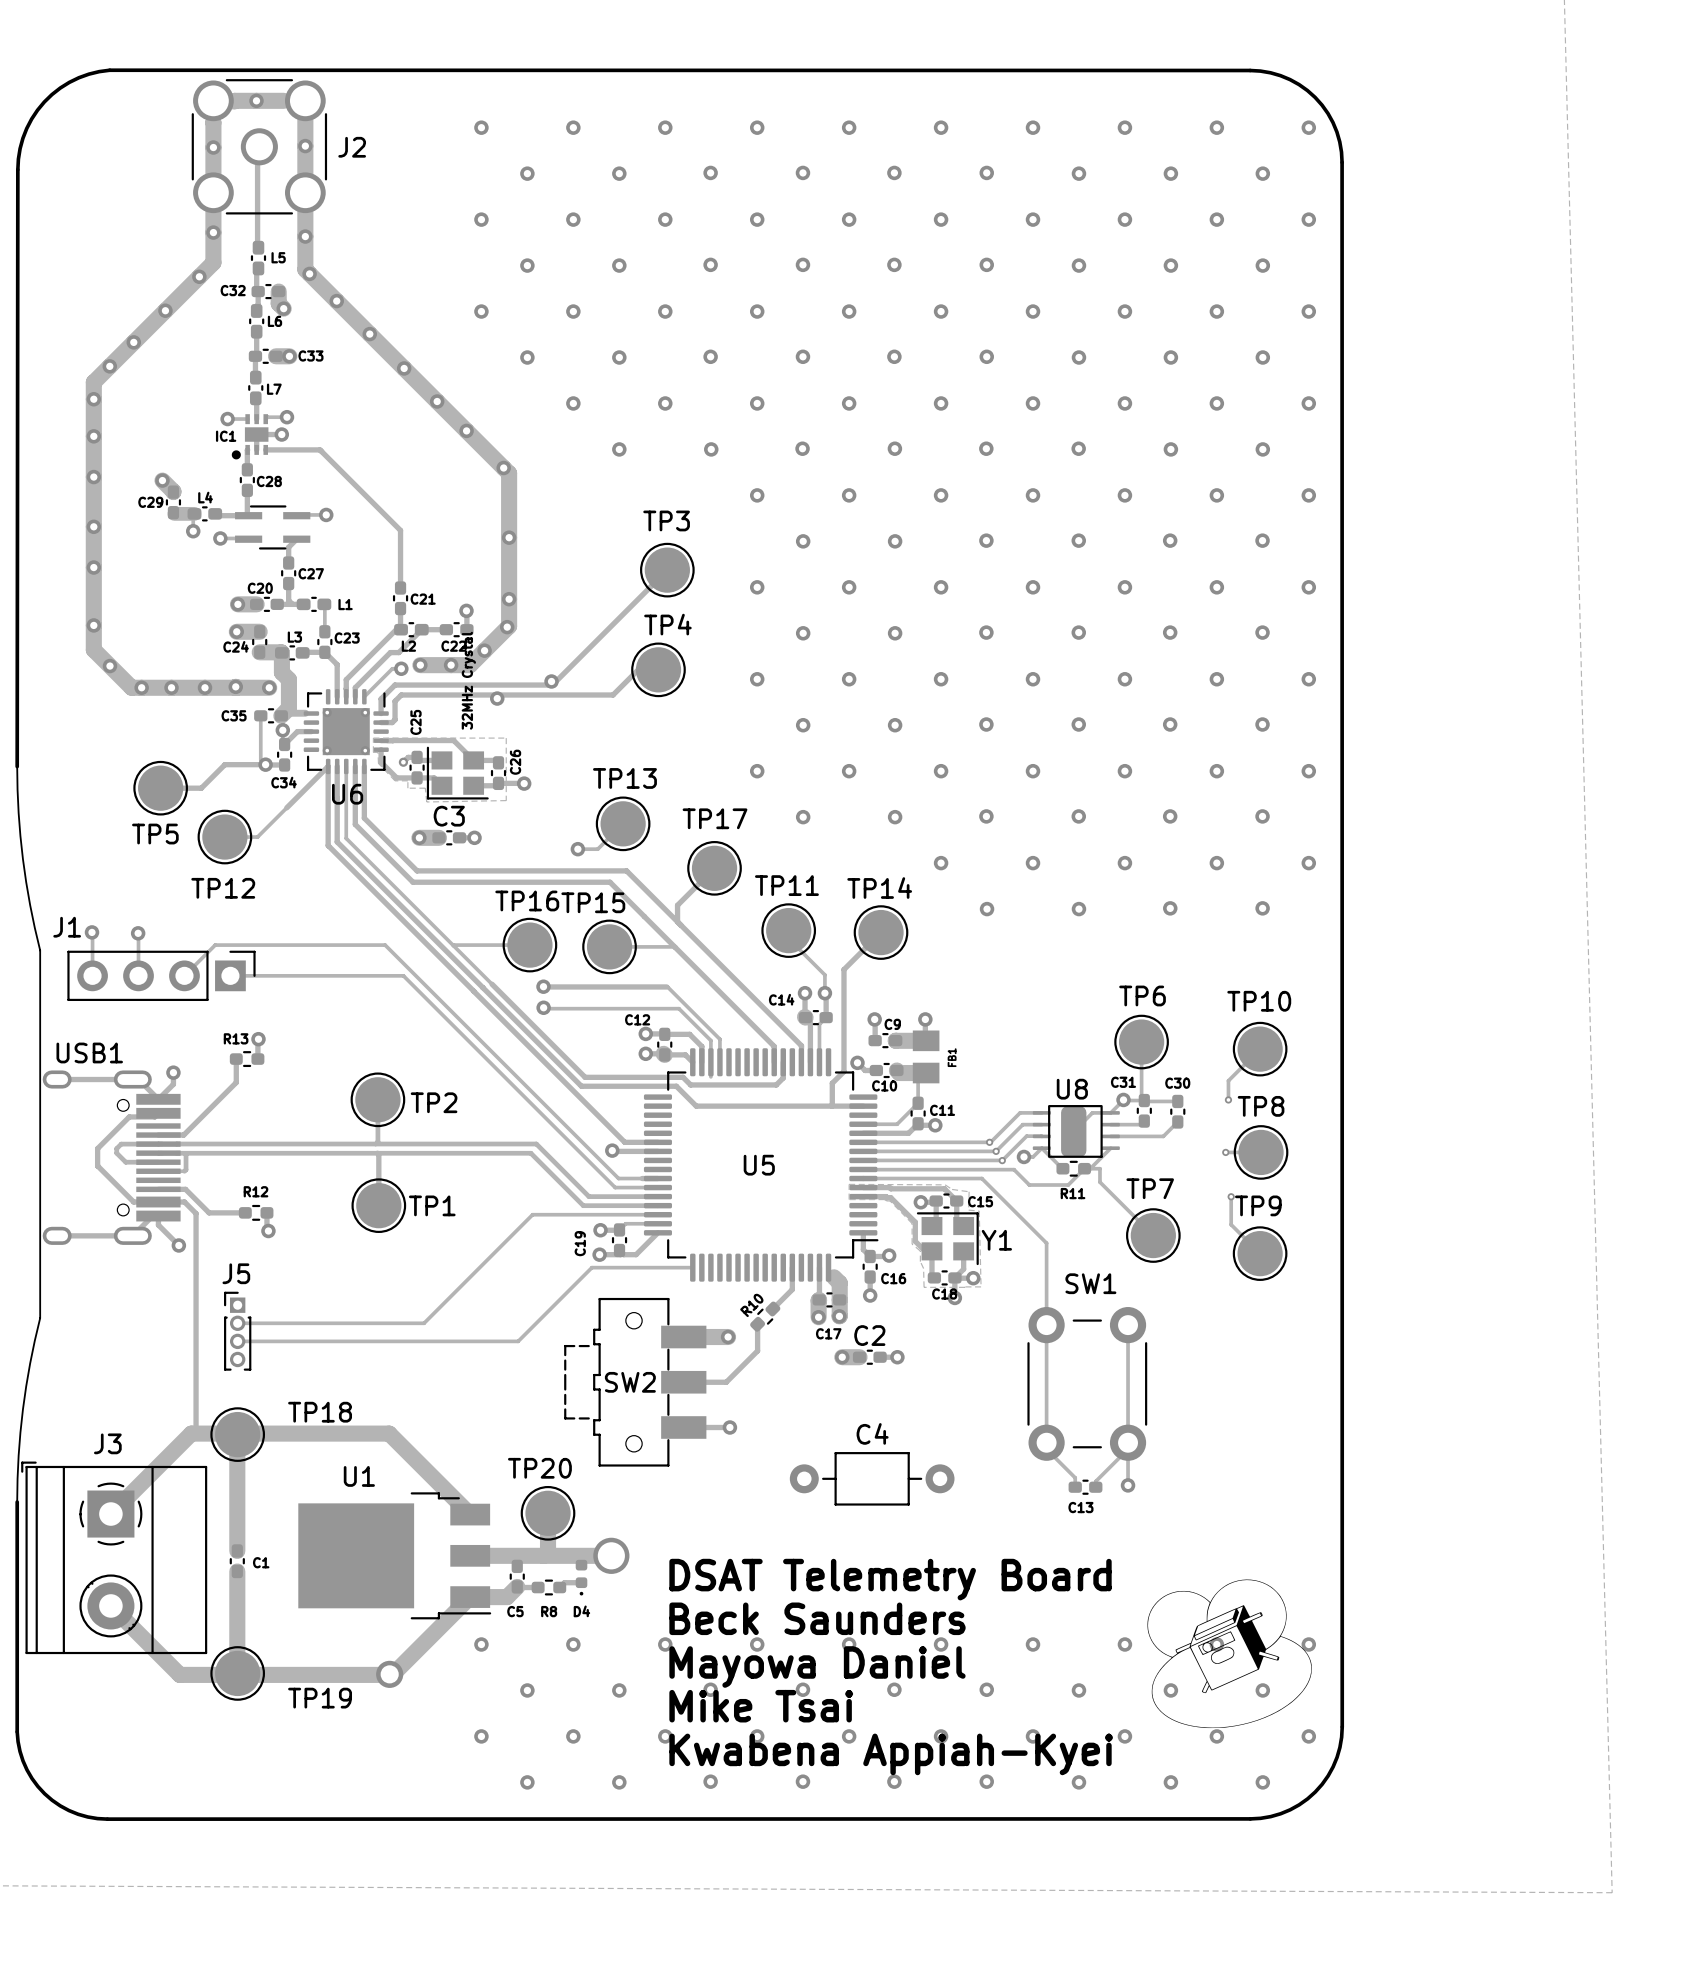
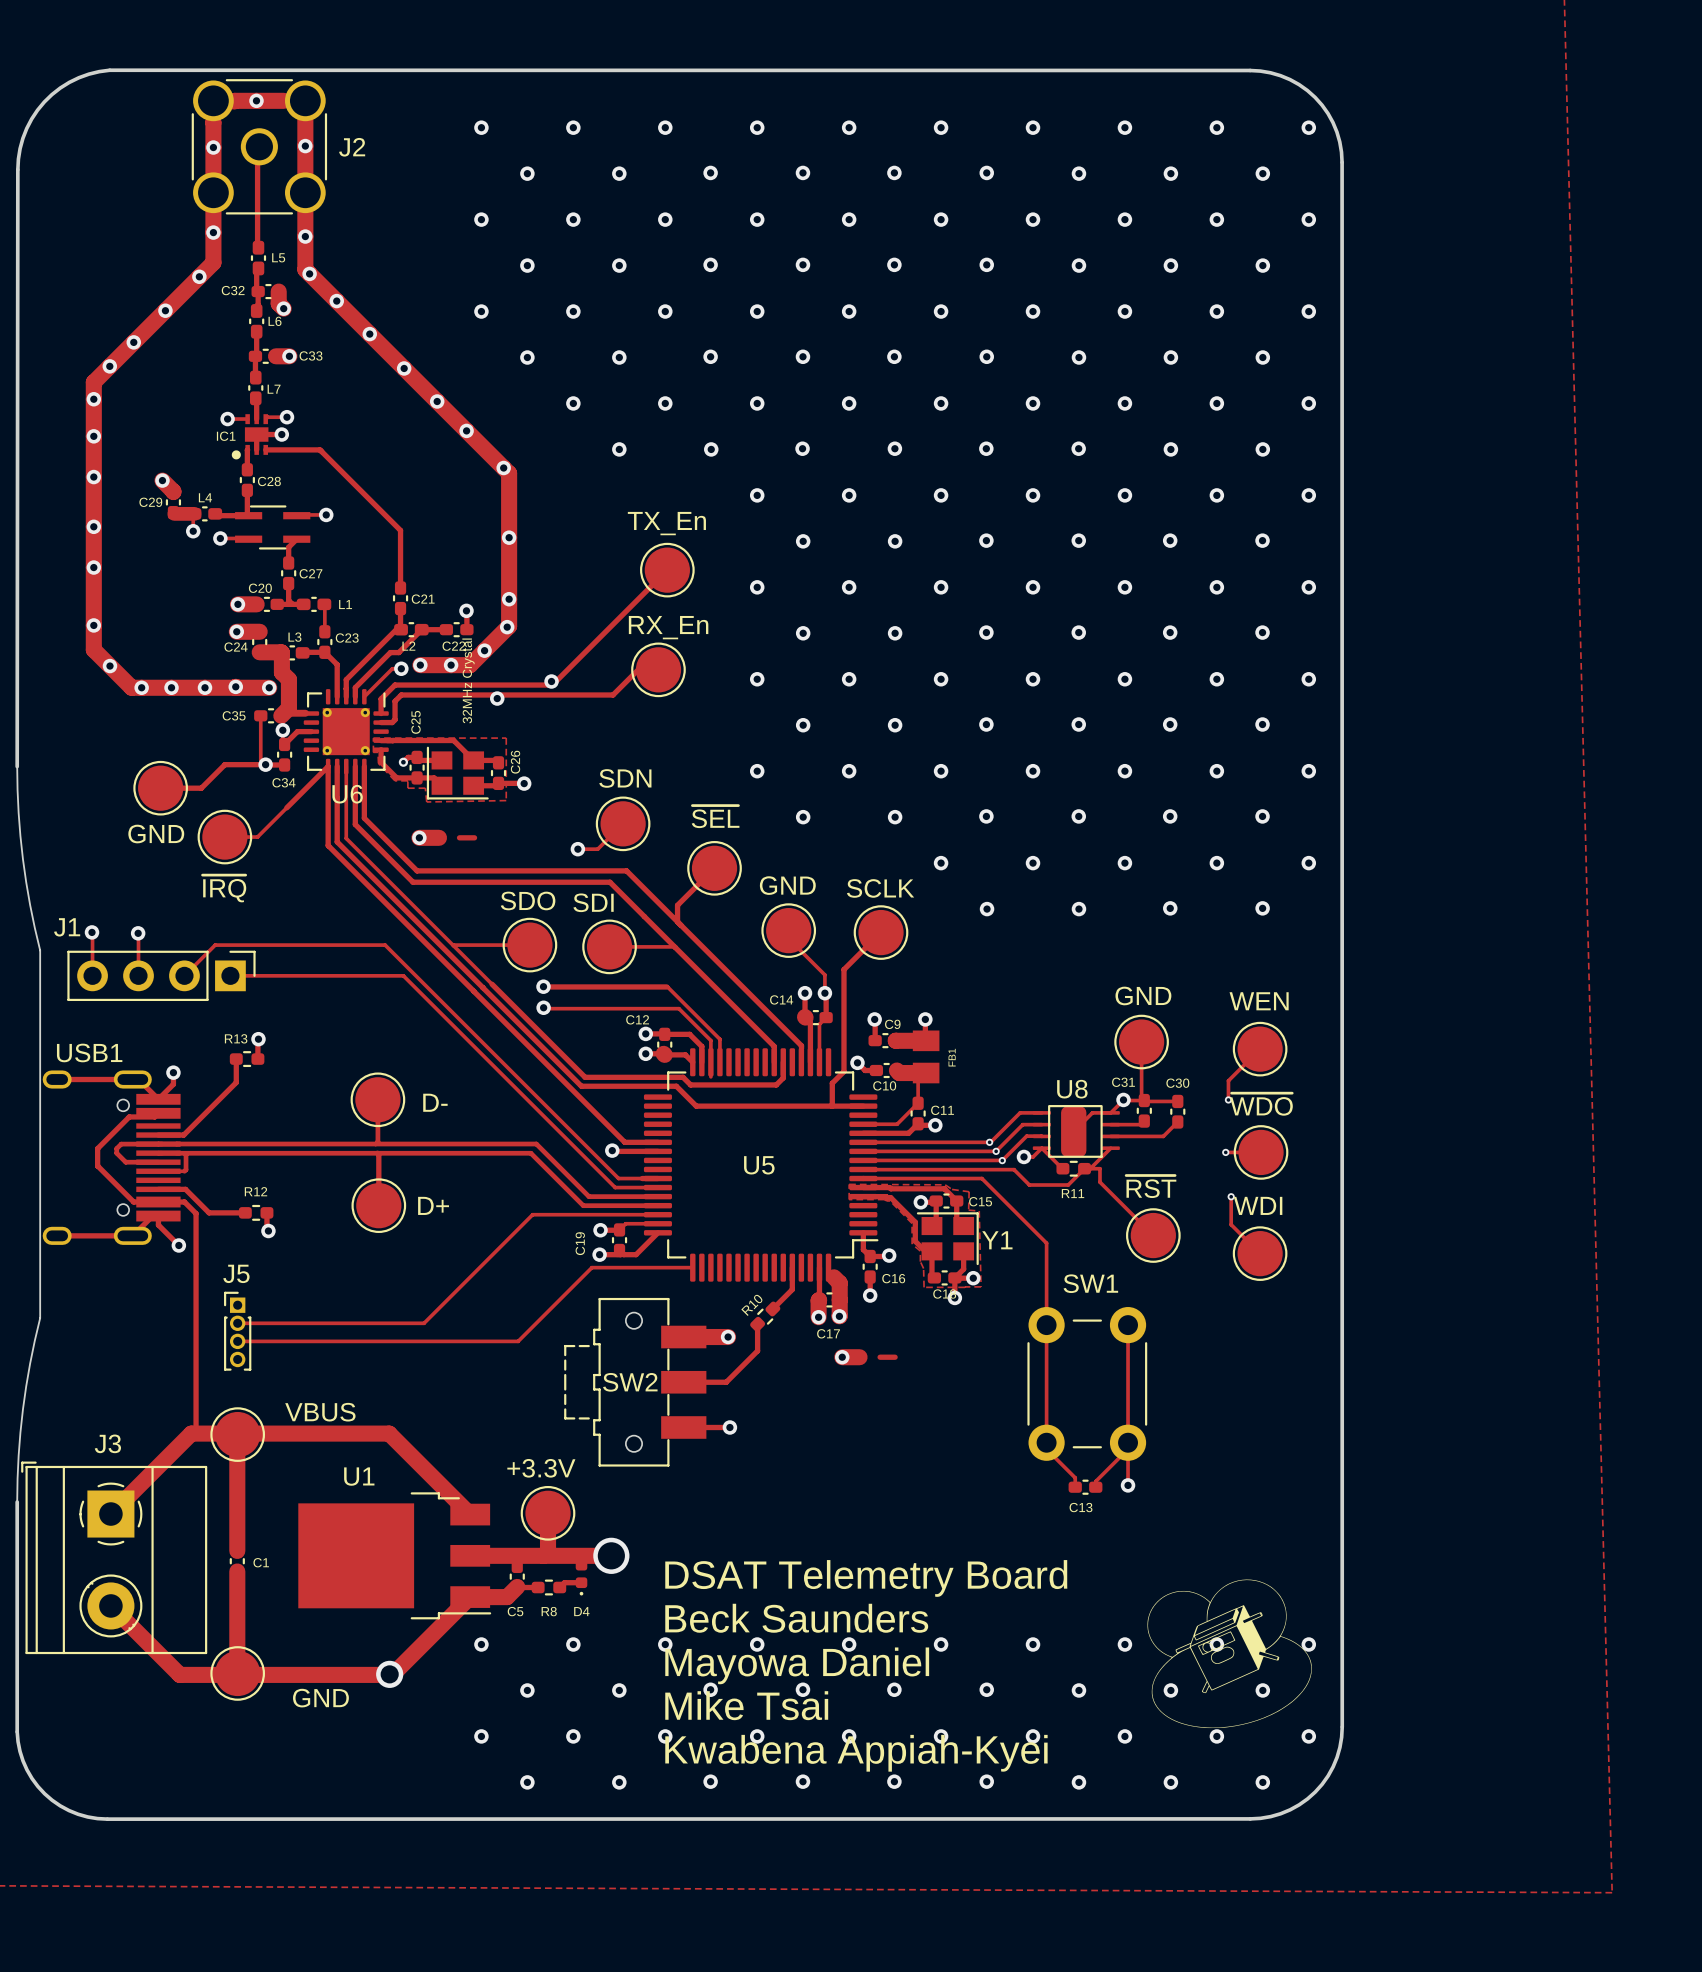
TP3 name: TP3 (666, 520) -> TX_En (666, 523)
TP4 name: TP4 (667, 624) -> RX_En (668, 627)
TP13 name: TP13 (624, 778) -> SDN (625, 778)
TP17 name: TP17 (715, 818) -> ~{SEL} (715, 816)
TP5 name: TP5 (155, 834) -> GND (156, 834)
C3: (449, 837) -> none
via: (474, 837) -> none
TP11 name: TP11 (786, 885) -> GND (787, 885)
TP12 name: TP12 (223, 888) -> ~{IRQ} (224, 888)
TP14 name: TP14 (879, 888) -> SCLK (880, 888)
TP16 name: TP16 (527, 900) -> SDO (528, 900)
TP15 name: TP15 (593, 902) -> SDI (593, 902)
TP6 name: TP6 (1142, 995) -> GND (1143, 995)
TP10 name: TP10 (1259, 1001) -> WEN (1259, 1001)
TP2 name: TP2 (434, 1102) -> D- (435, 1102)
TP8 name: TP8 (1261, 1106) -> ~{WDO} (1261, 1104)
TP7 name: TP7 (1150, 1188) -> ~{RST} (1151, 1186)
TP1 name: TP1 (432, 1205) -> D+ (433, 1205)
TP9 name: TP9 (1258, 1205) -> WDI (1258, 1205)
C2: (869, 1357) -> none
via: (897, 1357) -> none
TP18 name: TP18 (320, 1412) -> VBUS (320, 1412)
TP20 name: TP20 (539, 1468) -> +3.3V (541, 1468)
C4: (872, 1478) -> none
TP19 name: TP19 (320, 1698) -> GND (320, 1698)

